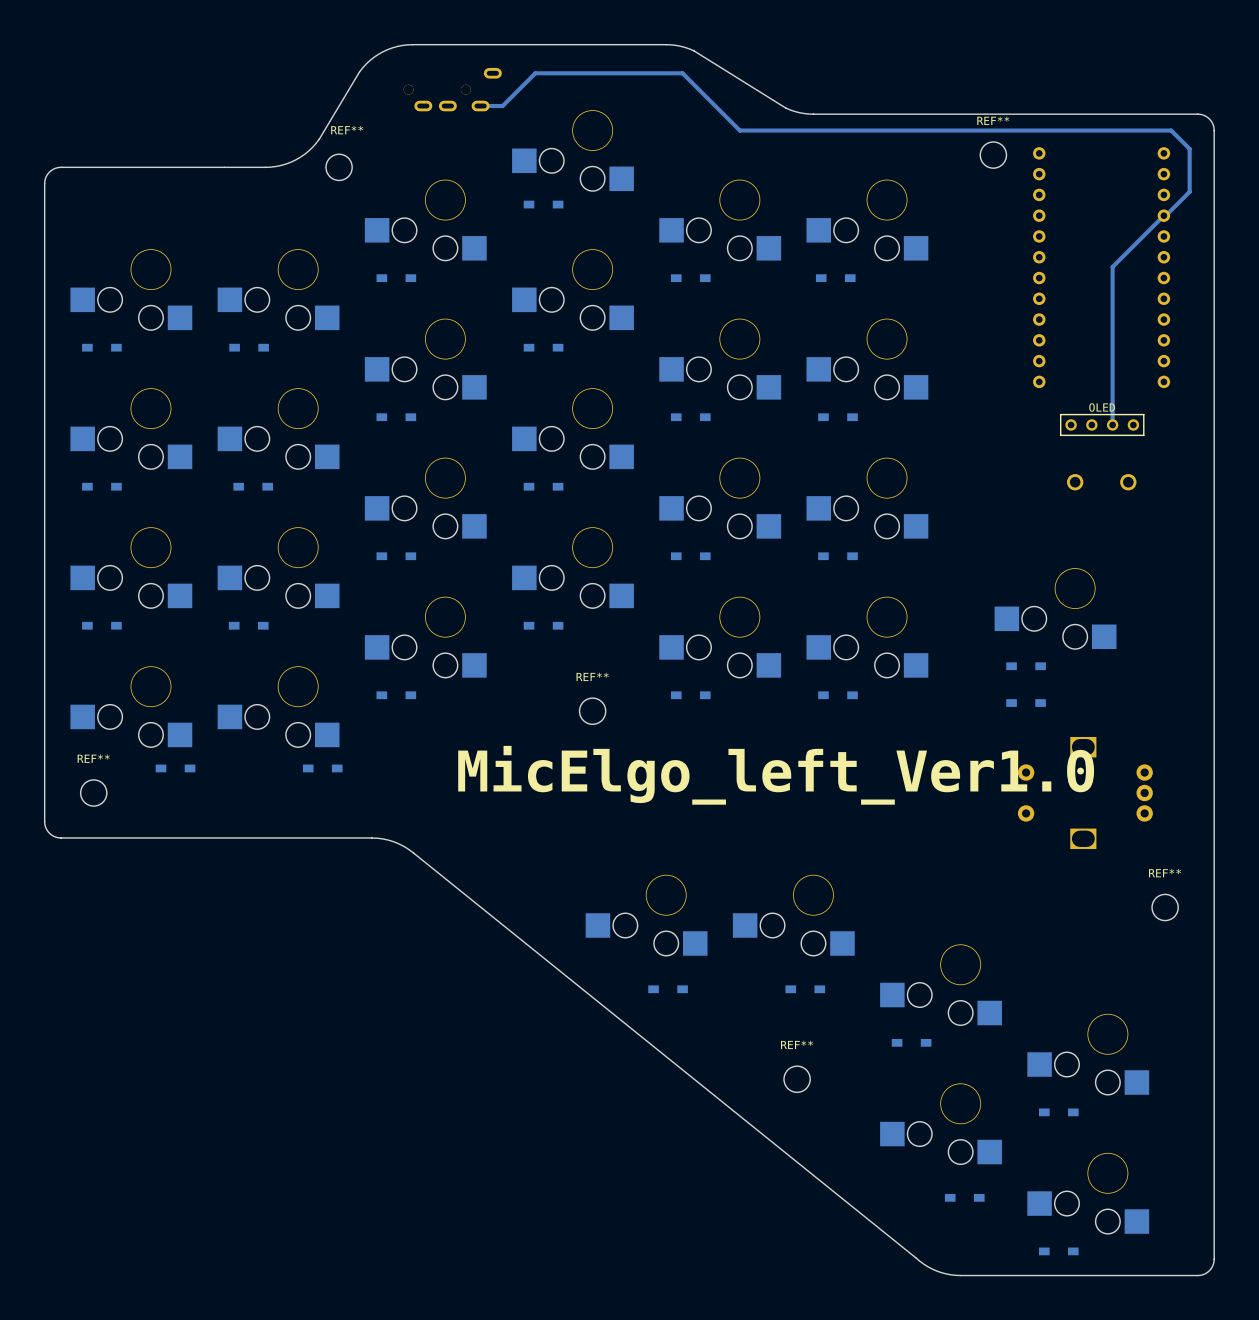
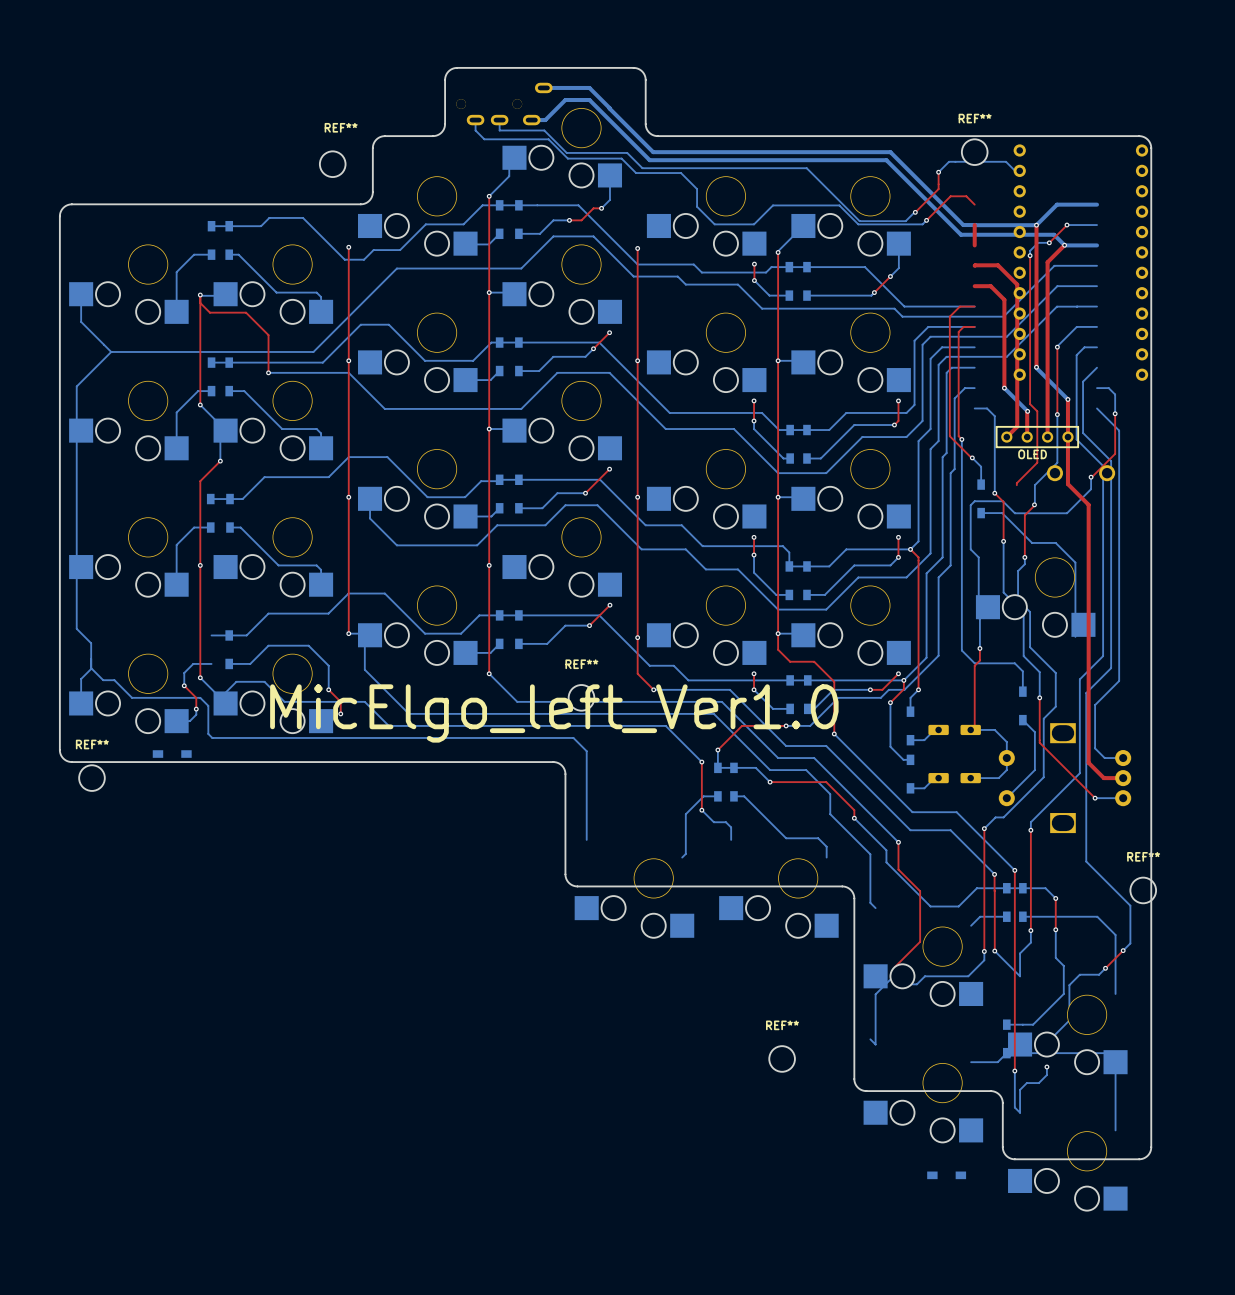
board edge: (412, 44) (675, 45) (693, 50) (785, 108) (808, 114) (1197, 114) (1204, 115) (1211, 121) (1214, 130) (1214, 1259) (1212, 1266) (1206, 1273) (1197, 1275) (960, 1275) (941, 1272) (928, 1266) (413, 853) (394, 841) (371, 837) (61, 837) (52, 835) (47, 830) (44, 821) (44, 183) (46, 176) (52, 169) (61, 167) (265, 167) (286, 163) (304, 154) (316, 143) (366, 64) (387, 49) (412, 44) -> (457, 67) (449, 70) (445, 76) (444, 125) (441, 132) (433, 136) (383, 136) (375, 140) (372, 148) (372, 193) (370, 199) (365, 203) (71, 204) (65, 205) (61, 210) (59, 216) (59, 750) (61, 756) (65, 760) (71, 762) (558, 762) (562, 766) (565, 772) (565, 875) (567, 881) (572, 885) (842, 886) (850, 889) (854, 898) (854, 1079) (859, 1088) (866, 1091) (995, 1091) (1000, 1095) (1002, 1101) (1003, 1150) (1006, 1155) (1011, 1158) (1139, 1159) (1145, 1157) (1149, 1153) (1151, 1147) (1151, 148) (1149, 142) (1145, 137) (1139, 136) (656, 136) (649, 132) (646, 127) (645, 78) (643, 72) (638, 68) (457, 67)
part position: (452, 89) -> (504, 104)
bottom track: none -> (539, 87) (589, 87) (653, 152) (890, 152) (963, 225) (1036, 225) (1057, 204) (1097, 204)
bottom track: (480, 106) (502, 106) (535, 73) (682, 73) (739, 130) (1171, 130) (1189, 148) (1189, 191) (1112, 266) (1112, 424) -> none
bottom track: none -> (471, 120) (475, 120) (475, 130) (484, 139) (548, 139) (567, 158) (621, 158) (636, 173) (681, 173) (697, 189) (697, 206) (714, 224) (754, 224) (772, 205) (839, 205) (858, 224) (922, 224) (926, 220)
bottom track: none -> (495, 120) (499, 124) (499, 130) (544, 130) (566, 152) (627, 152) (642, 168) (806, 168) (859, 221) (905, 221) (914, 212)
bottom track: none -> (527, 120) (545, 120) (565, 100) (589, 100) (649, 160) (886, 160) (961, 234) (1054, 234) (1064, 245) (1097, 245)
bottom track: none -> (514, 157) (509, 163) (509, 176) (489, 196)
bottom track: none -> (938, 172) (949, 161) (1006, 161) (1019, 175)
top track: none -> (938, 172) (938, 189) (915, 212)
via: none -> (938, 172)
bottom track: none -> (609, 175) (609, 199) (601, 208)
top track: none -> (489, 196) (489, 673)
via: none -> (489, 196)
part side: top (543, 204) -> bottom (518, 219)
top track: none -> (974, 204) (966, 196) (950, 196) (926, 220)
top track: none -> (601, 208) (593, 208) (581, 220) (569, 220)
via: none -> (601, 208)
via: none -> (915, 212)
bottom track: none -> (569, 220) (553, 220) (539, 233) (518, 233)
via: none -> (569, 220)
via: none -> (926, 220)
top track: none -> (974, 225) (974, 245)
top track: none -> (1036, 225) (1036, 367)
via: none -> (1036, 225)
bottom track: none -> (1067, 225) (1097, 225)
top track: none -> (1067, 225) (1049, 242)
via: none -> (1067, 225)
bottom track: none -> (211, 226) (261, 226) (269, 217) (303, 217) (344, 259) (364, 259) (373, 250) (400, 250) (425, 224) (463, 224) (482, 205) (578, 205) (637, 264) (693, 264) (701, 272) (766, 272) (771, 267) (864, 267) (904, 306) (974, 306)
bottom track: none -> (803, 225) (778, 252)
bottom track: none -> (499, 233) (489, 244) (465, 243)
bottom track: none -> (1049, 242) (1038, 242) (1030, 250) (1030, 255)
via: none -> (1049, 242)
bottom track: none -> (898, 243) (898, 268) (890, 276)
top track: none -> (1064, 245) (1047, 262) (1047, 437)
via: none -> (1064, 245)
top track: none -> (348, 247) (348, 633)
via: none -> (348, 247)
top track: none -> (637, 248) (637, 673) (653, 689)
via: none -> (637, 248)
via: none -> (778, 252)
top track: none -> (778, 253) (778, 649) (790, 661) (814, 661) (834, 681) (834, 733)
bottom track: none -> (211, 254) (194, 254) (176, 272) (176, 311)
bottom track: none -> (229, 254) (238, 254) (276, 292) (316, 292) (321, 297) (321, 311)
top track: none -> (1030, 255) (1030, 404) (1037, 411) (1037, 462) (1016, 485)
via: none -> (1030, 255)
top track: none -> (754, 264) (754, 280)
via: none -> (754, 264)
top track: none -> (974, 265) (997, 265) (1017, 284) (1017, 426) (1006, 437)
bottom track: none -> (1097, 265) (1054, 265) (1003, 316) (902, 316) (894, 308) (762, 308) (737, 284) (685, 284) (677, 276) (633, 276) (593, 236) (553, 236) (521, 268) (396, 268) (313, 351) (111, 351)
part side: top (396, 278) -> bottom (499, 219)
part side: top (690, 278) -> bottom (789, 281)
part side: top (835, 278) -> bottom (806, 281)
top track: none -> (890, 276) (874, 292)
via: none -> (890, 276)
bottom track: none -> (754, 280) (769, 295) (789, 295)
via: none -> (754, 280)
top track: none -> (974, 286) (990, 286) (1004, 299) (1004, 388)
bottom track: none -> (1097, 286) (1057, 286) (1006, 336) (930, 336) (922, 344) (922, 421) (906, 437) (862, 437) (826, 473) (778, 473) (733, 429) (665, 429) (609, 372) (557, 372) (521, 408) (384, 408) (348, 372) (268, 372)
bottom track: none -> (489, 292) (512, 292) (514, 294)
via: none -> (489, 292)
bottom track: none -> (874, 292) (871, 295) (806, 295)
via: none -> (874, 292)
bottom track: none -> (81, 294) (81, 321) (111, 351)
bottom track: none -> (225, 294) (223, 295) (200, 295)
top track: none -> (200, 295) (200, 404)
via: none -> (200, 295)
top track: none -> (200, 303) (209, 312) (246, 312) (268, 335) (268, 372)
top track: none -> (974, 306) (959, 306) (949, 316) (949, 436) (972, 457)
bottom track: none -> (1077, 306) (1097, 306)
bottom track: none -> (1077, 306) (1056, 306) (1006, 356) (946, 356) (938, 364) (938, 441) (930, 449) (930, 553) (906, 577) (858, 577) (826, 609) (778, 609) (737, 569) (705, 569) (685, 549) (641, 549) (597, 505) (565, 505) (545, 525) (497, 525) (477, 545) (396, 545) (370, 518) (370, 498)
bottom track: none -> (974, 326) (928, 326) (914, 340) (914, 404) (906, 412) (846, 412) (829, 430) (779, 430) (762, 412) (669, 412) (599, 342) (491, 342) (473, 360) (425, 360) (388, 324) (360, 324) (322, 362) (211, 362)
top track: none -> (974, 326) (963, 326) (958, 331) (958, 436) (961, 439)
bottom track: none -> (1097, 326) (1076, 326) (1057, 347)
top track: none -> (609, 332) (593, 348)
via: none -> (609, 332)
part side: top (101, 347) -> bottom (211, 240)
part side: top (249, 347) -> bottom (229, 240)
part side: top (543, 347) -> bottom (518, 356)
bottom track: none -> (974, 347) (942, 347) (930, 358) (930, 429) (918, 441) (918, 541) (910, 549) (846, 549) (829, 566) (789, 566) (789, 552) (782, 546) (702, 546) (681, 525) (645, 525) (600, 479) (481, 481) (465, 497) (427, 497) (387, 457) (348, 457) (328, 477) (264, 477) (242, 499) (210, 499)
top track: none -> (1057, 347) (1057, 414)
via: none -> (1057, 347)
bottom track: none -> (1097, 347) (1084, 347) (1076, 355) (1076, 439) (1103, 465) (1103, 656) (1079, 679) (1079, 773) (1030, 822) (1030, 830)
bottom track: none -> (593, 348) (585, 356) (553, 356) (539, 371) (518, 371)
via: none -> (593, 348)
bottom track: none -> (111, 351) (76, 386) (76, 628) (91, 643) (91, 668) (81, 679) (81, 693) (75, 698) (81, 703)
via: none -> (348, 360)
via: none -> (637, 360)
bottom track: none -> (778, 360) (801, 360) (803, 362)
via: none -> (778, 360)
bottom track: none -> (974, 367) (951, 367) (946, 372) (946, 453) (942, 457) (942, 557) (926, 573) (926, 657) (903, 680) (688, 680) (673, 665) (649, 665) (599, 615) (479, 615) (461, 633) (425, 633) (384, 593) (348, 593) (328, 613) (268, 613) (246, 635) (211, 635)
bottom track: none -> (1036, 367) (1067, 399)
via: none -> (1036, 367)
bottom track: none -> (1097, 367) (1083, 381) (1083, 433) (1111, 461) (1111, 668) (1086, 693) (1086, 861) (1130, 905) (1130, 943) (1123, 950)
bottom track: none -> (499, 371) (490, 380) (465, 380)
via: none -> (268, 372)
bottom track: none -> (974, 388) (965, 388) (954, 398) (954, 469) (950, 473) (950, 565) (938, 577) (938, 655) (904, 689) (888, 689) (880, 697) (838, 697) (810, 725) (786, 725)
bottom track: none -> (1004, 388) (1027, 411)
via: none -> (1004, 388)
bottom track: none -> (1097, 388) (1108, 388) (1115, 394) (1115, 413)
bottom track: none -> (211, 391) (198, 391) (176, 412) (176, 448)
bottom track: none -> (229, 391) (244, 391) (282, 429) (316, 429) (321, 433) (321, 448)
top track: none -> (1067, 399) (1067, 484) (1088, 504) (1088, 762) (1103, 778) (1123, 778)
via: none -> (1067, 399)
top track: none -> (754, 400) (754, 421)
via: none -> (754, 400)
top track: none -> (898, 400) (898, 421) (894, 425)
via: none -> (898, 400)
bottom track: none -> (200, 404) (225, 430) (220, 435) (220, 461)
via: none -> (200, 404)
bottom track: none -> (974, 408) (987, 408) (994, 416) (994, 493)
bottom track: none -> (1097, 408) (1119, 430) (1119, 681) (1095, 705) (1095, 748) (1104, 758) (1123, 758)
part side: top (396, 417) -> bottom (499, 356)
part side: top (690, 417) -> bottom (790, 444)
part side: top (837, 417) -> bottom (806, 444)
top track: none -> (1027, 411) (1027, 437)
via: none -> (1027, 411)
top track: none -> (1115, 413) (1115, 453) (1091, 477)
via: none -> (1115, 413)
bottom track: none -> (1057, 414) (1057, 462) (1034, 485) (1034, 504)
via: none -> (1057, 414)
part: (1102, 424) -> none
bottom track: none -> (754, 421) (754, 429) (783, 458) (790, 458)
via: none -> (754, 421)
bottom track: none -> (894, 425) (854, 425) (820, 458) (806, 458)
via: none -> (894, 425)
bottom track: none -> (489, 429) (512, 429) (514, 430)
via: none -> (489, 429)
part: none -> (1037, 437)
bottom track: none -> (961, 438) (961, 650) (974, 663) (1014, 663) (1022, 671) (1022, 691)
via: none -> (961, 439)
bottom track: none -> (972, 457) (981, 466) (981, 484)
via: none -> (972, 457)
top track: none -> (220, 461) (200, 481) (200, 677)
via: none -> (220, 461)
top track: none -> (609, 469) (585, 493)
via: none -> (609, 469)
part side: top (101, 486) -> bottom (211, 376)
part side: top (253, 486) -> bottom (229, 376)
part side: top (543, 486) -> bottom (518, 494)
bottom track: none -> (1091, 477) (1091, 489) (1067, 513) (1014, 513) (1002, 501) (974, 501) (970, 505) (970, 549) (978, 557) (979, 648)
via: none -> (1091, 477)
bottom track: none -> (585, 493) (557, 493) (542, 508) (518, 508)
via: none -> (585, 493)
top track: none -> (994, 493) (1003, 502) (1003, 541)
via: none -> (994, 493)
via: none -> (348, 497)
via: none -> (637, 497)
bottom track: none -> (778, 497) (801, 497) (803, 498)
via: none -> (778, 497)
part: none -> (981, 498)
top track: none -> (1034, 504) (1024, 515) (1024, 557)
via: none -> (1034, 504)
bottom track: none -> (499, 508) (491, 516) (465, 516)
bottom track: none -> (981, 513) (1002, 513) (1032, 542) (1055, 542) (1075, 562) (1075, 636)
bottom track: none -> (210, 527) (194, 527) (176, 544) (176, 584)
bottom track: none -> (230, 527) (240, 527) (278, 565) (316, 565) (321, 569) (321, 584)
top track: none -> (754, 537) (754, 555)
via: none -> (754, 537)
top track: none -> (898, 537) (898, 557)
via: none -> (898, 537)
bottom track: none -> (1003, 541) (1003, 592) (1023, 612) (1023, 656) (1039, 672) (1039, 697)
via: none -> (1003, 541)
part side: top (396, 556) -> bottom (499, 494)
part side: top (690, 556) -> bottom (789, 580)
part side: top (837, 556) -> bottom (806, 580)
top track: none -> (910, 549) (918, 557) (918, 689)
via: none -> (910, 549)
bottom track: none -> (754, 555) (754, 572) (776, 594) (789, 594)
via: none -> (754, 555)
bottom track: none -> (898, 557) (890, 565) (854, 565) (824, 594) (806, 594)
via: none -> (898, 557)
bottom track: none -> (1024, 557) (1024, 564) (1018, 571) (1018, 599) (1030, 611) (1030, 647) (1055, 672) (1055, 706) (1043, 718) (1043, 777) (1003, 817) (995, 817) (984, 828)
via: none -> (1024, 557)
via: none -> (200, 565)
via: none -> (489, 565)
top track: none -> (609, 605) (589, 625)
via: none -> (609, 605)
part side: top (101, 625) -> bottom (210, 513)
part side: top (248, 625) -> bottom (230, 513)
part side: top (543, 625) -> bottom (518, 629)
bottom track: none -> (589, 625) (565, 625) (547, 643) (518, 643)
via: none -> (589, 625)
bottom track: none -> (348, 633) (370, 635) (364, 640) (364, 669) (408, 713) (713, 713) (770, 770) (806, 770) (830, 794) (830, 814) (870, 854) (870, 902) (875, 908)
via: none -> (348, 633)
bottom track: none -> (778, 633) (801, 633)
via: none -> (778, 633)
via: none -> (637, 637)
bottom track: none -> (499, 643) (490, 652) (465, 652)
top track: none -> (979, 648) (979, 660) (974, 665) (974, 729)
via: none -> (979, 648)
part: (1026, 666) -> none
bottom track: none -> (211, 663) (193, 663) (184, 672) (184, 685)
bottom track: none -> (229, 663) (250, 663) (268, 645) (308, 645) (328, 665) (328, 689)
bottom track: none -> (91, 668) (103, 680) (114, 680) (132, 697) (200, 697) (208, 705) (208, 733) (212, 737) (573, 737) (586, 751) (586, 839)
bottom track: none -> (489, 673) (517, 701) (721, 701) (778, 758) (814, 758) (898, 842)
via: none -> (489, 673)
top track: none -> (754, 673) (754, 689)
via: none -> (754, 673)
top track: none -> (898, 673) (882, 689) (870, 689)
via: none -> (898, 673)
bottom track: none -> (200, 677) (220, 697)
via: none -> (200, 677)
top track: none -> (903, 680) (903, 689) (890, 702)
via: none -> (903, 680)
part side: top (396, 695) -> bottom (499, 629)
part side: top (690, 695) -> bottom (790, 694)
part side: top (837, 695) -> bottom (807, 694)
top track: none -> (184, 685) (196, 697) (196, 709)
via: none -> (184, 685)
top track: none -> (328, 689) (340, 701) (340, 713)
via: none -> (328, 689)
bottom track: none -> (653, 689) (729, 689) (786, 746) (826, 746) (910, 830) (950, 830) (994, 874)
via: none -> (653, 689)
bottom track: none -> (754, 689) (773, 708) (790, 708)
via: none -> (754, 689)
bottom track: none -> (870, 689) (833, 689) (814, 708) (807, 708)
via: none -> (870, 689)
bottom track: none -> (918, 689) (910, 697) (910, 711)
via: none -> (918, 689)
part side: top (1026, 703) -> bottom (1022, 705)
bottom track: none -> (220, 697) (236, 681) (264, 681) (284, 701) (364, 701) (388, 725) (665, 725) (701, 762)
top track: none -> (1039, 697) (1039, 742) (1095, 798)
via: none -> (1039, 697)
bottom track: none -> (890, 702) (890, 746) (903, 759) (910, 759)
via: none -> (890, 702)
bottom track: none -> (196, 709) (196, 714) (189, 721) (176, 721)
via: none -> (196, 709)
text: none -> MicElgo_left_Ver1.0 (554, 713)
via: none -> (340, 713)
bottom track: none -> (1022, 720) (1034, 732) (1034, 770) (1006, 798)
top track: none -> (786, 725) (741, 725) (717, 750)
via: none -> (786, 725)
part: none -> (910, 725)
bottom track: none -> (934, 729) (924, 740) (910, 740)
part: none -> (954, 729)
bottom track: none -> (974, 729) (994, 729) (1006, 741) (1006, 770) (998, 778) (974, 778)
bottom track: none -> (834, 733) (912, 812) (956, 812) (1014, 870)
via: none -> (834, 733)
bottom track: none -> (717, 750) (717, 767) (755, 767) (770, 782)
via: none -> (717, 750)
part side: top (322, 768) -> bottom (229, 649)
text: MicElgo_left_Ver1.0 (776, 775) -> none
top track: none -> (701, 762) (701, 810)
via: none -> (701, 762)
part: none -> (910, 774)
bottom track: none -> (934, 778) (924, 788) (910, 788)
part: none -> (954, 778)
part: none -> (717, 782)
part: none -> (733, 782)
top track: none -> (770, 782) (826, 782) (854, 810) (854, 818)
via: none -> (770, 782)
bottom track: none -> (717, 796) (703, 796) (685, 814) (685, 853) (682, 857)
bottom track: none -> (733, 796) (744, 796) (786, 838) (818, 838) (826, 846) (826, 857)
bottom track: none -> (1095, 798) (1123, 798)
via: none -> (1095, 798)
bottom track: none -> (701, 810) (713, 822) (725, 822) (731, 827) (731, 839)
via: none -> (701, 810)
bottom track: none -> (854, 818) (886, 850) (886, 862) (930, 906) (958, 906) (976, 888) (1045, 888) (1055, 898)
via: none -> (854, 818)
top track: none -> (984, 828) (984, 951)
via: none -> (984, 828)
top track: none -> (1030, 830) (1030, 930)
via: none -> (1030, 830)
top track: none -> (898, 842) (898, 869) (920, 891) (920, 941) (894, 967)
via: none -> (898, 842)
top track: none -> (1014, 870) (1014, 1071)
via: none -> (1014, 870)
top track: none -> (994, 874) (994, 951)
via: none -> (994, 874)
top track: none -> (1055, 898) (1055, 929)
via: none -> (1055, 898)
part: none -> (1022, 902)
bottom track: none -> (1006, 916) (980, 916) (971, 925)
bottom track: none -> (1022, 916) (1097, 916) (1115, 934) (1115, 993)
bottom track: none -> (1055, 929) (1055, 957) (1063, 965) (1063, 993) (1033, 1024) (1006, 1024)
via: none -> (1055, 929)
bottom track: none -> (1030, 930) (1030, 942) (1020, 953) (1020, 976) (994, 951)
via: none -> (1030, 930)
top track: none -> (1123, 950) (1105, 968)
via: none -> (1123, 950)
bottom track: none -> (984, 951) (984, 960) (968, 976) (924, 976) (916, 984) (904, 984) (894, 975)
via: none -> (984, 951)
via: none -> (994, 951)
bottom track: none -> (894, 967) (894, 975) (875, 994) (875, 1044) (870, 1039)
bottom track: none -> (1105, 968) (1099, 974) (1079, 974) (1069, 985) (1069, 1020) (1046, 1042)
via: none -> (1105, 968)
part: (668, 989) -> none
part: (805, 989) -> none
part side: top (911, 1042) -> bottom (1006, 1038)
bottom track: none -> (1006, 1053) (997, 1062) (971, 1062)
bottom track: none -> (1022, 1053) (1105, 1053) (1115, 1063) (1115, 1130)
bottom track: none -> (1046, 1067) (1046, 1075) (1038, 1083) (1026, 1083) (1020, 1089) (1020, 1112) (1014, 1107) (1014, 1071)
via: none -> (1046, 1067)
via: none -> (1014, 1071)
part side: top (1058, 1112) -> bottom (1006, 902)
part: (1058, 1251) -> none

